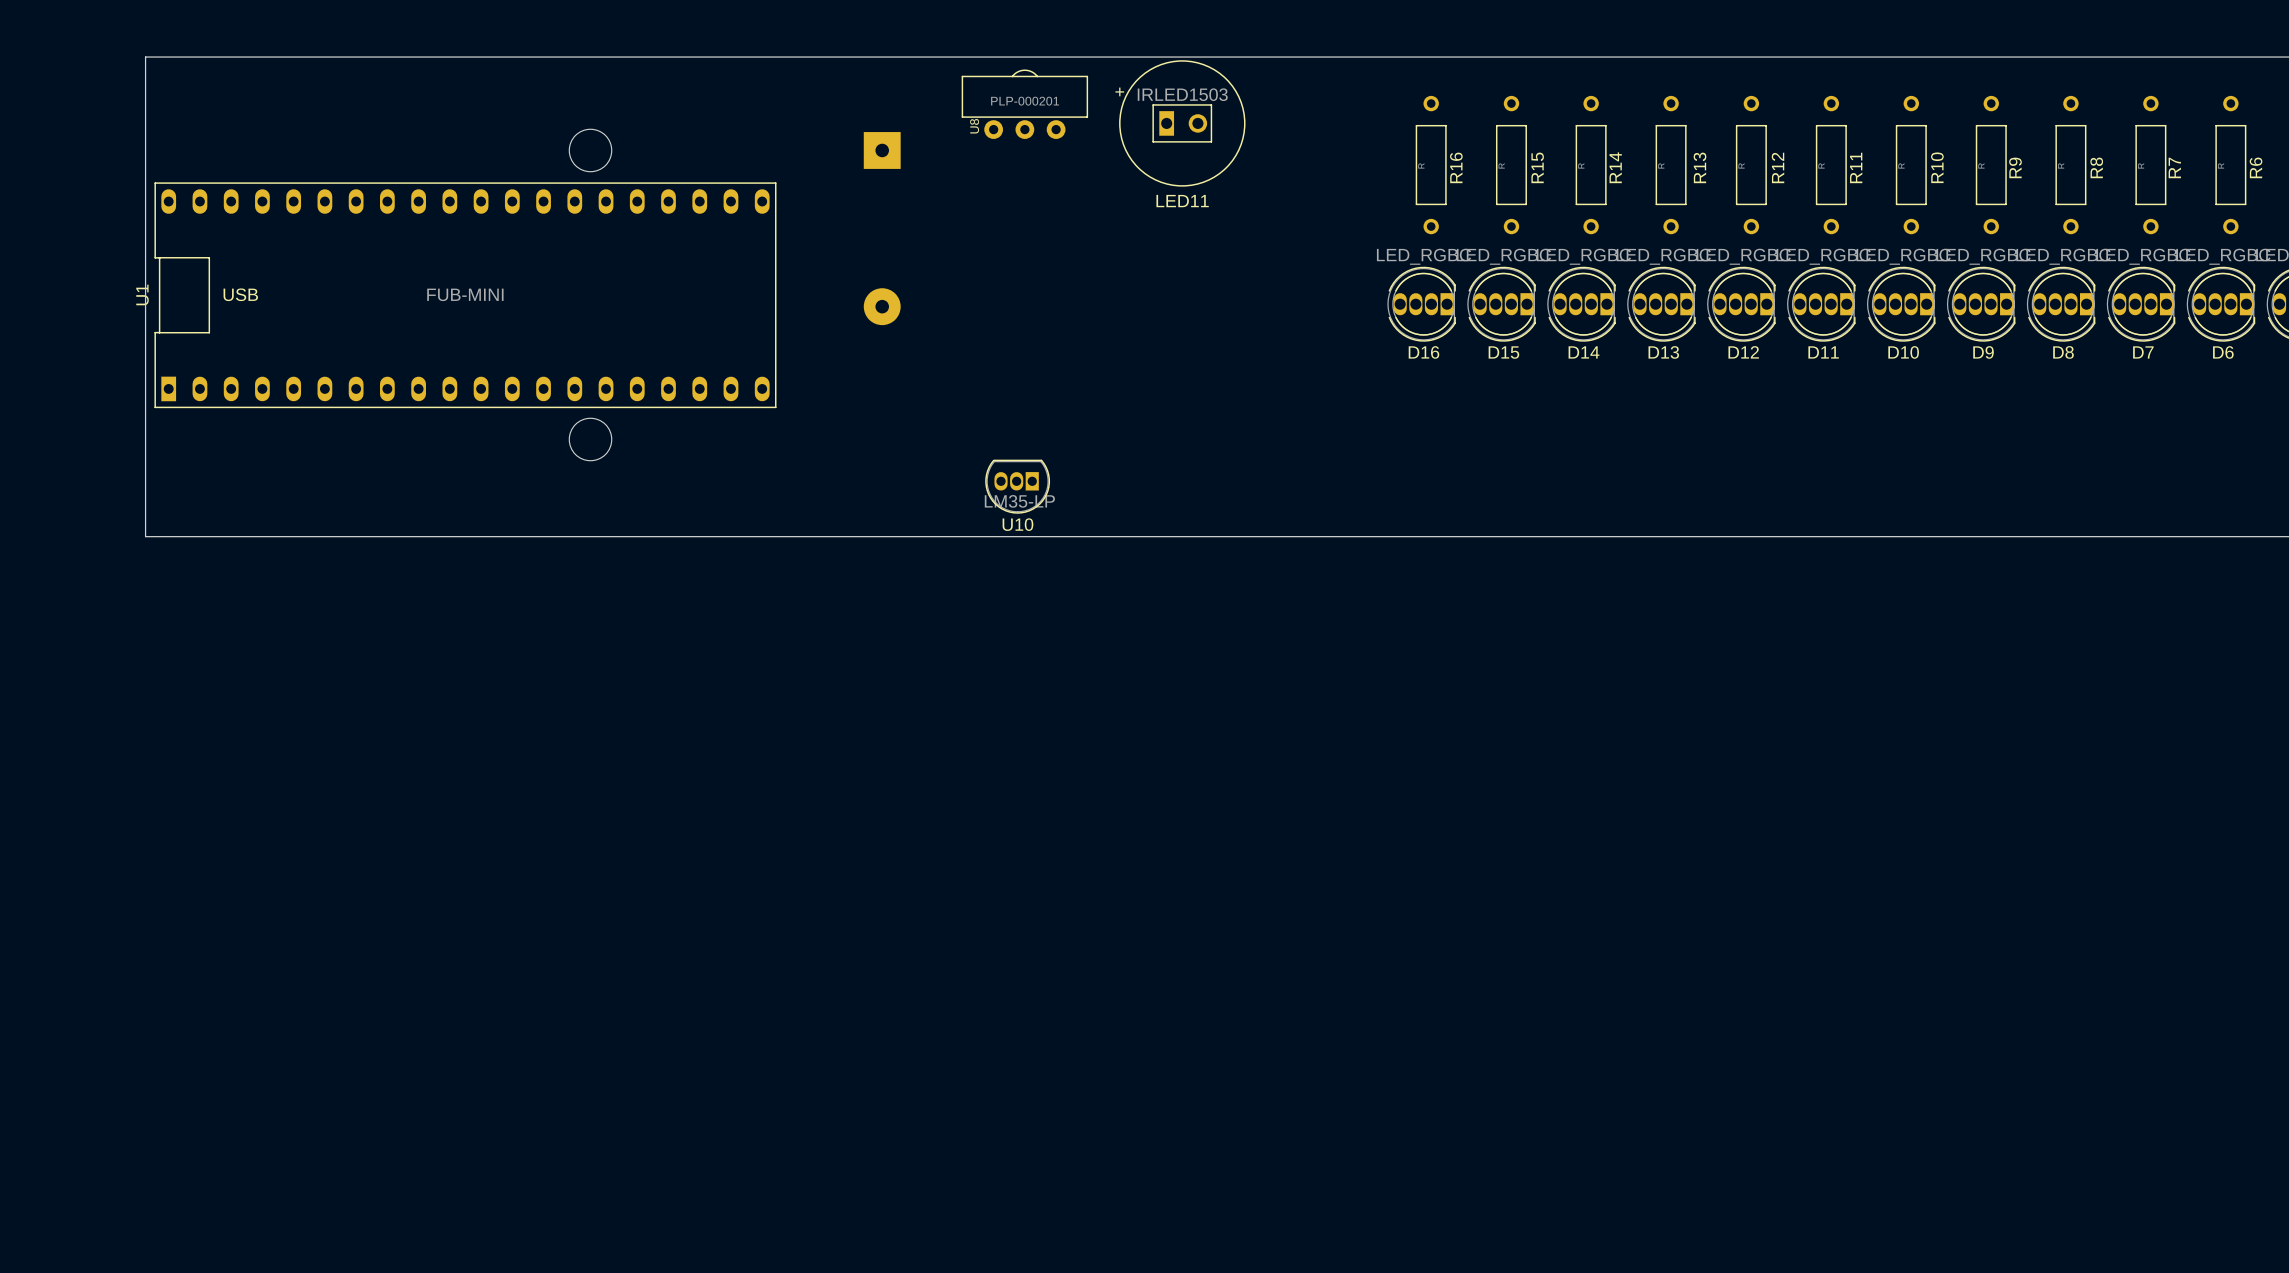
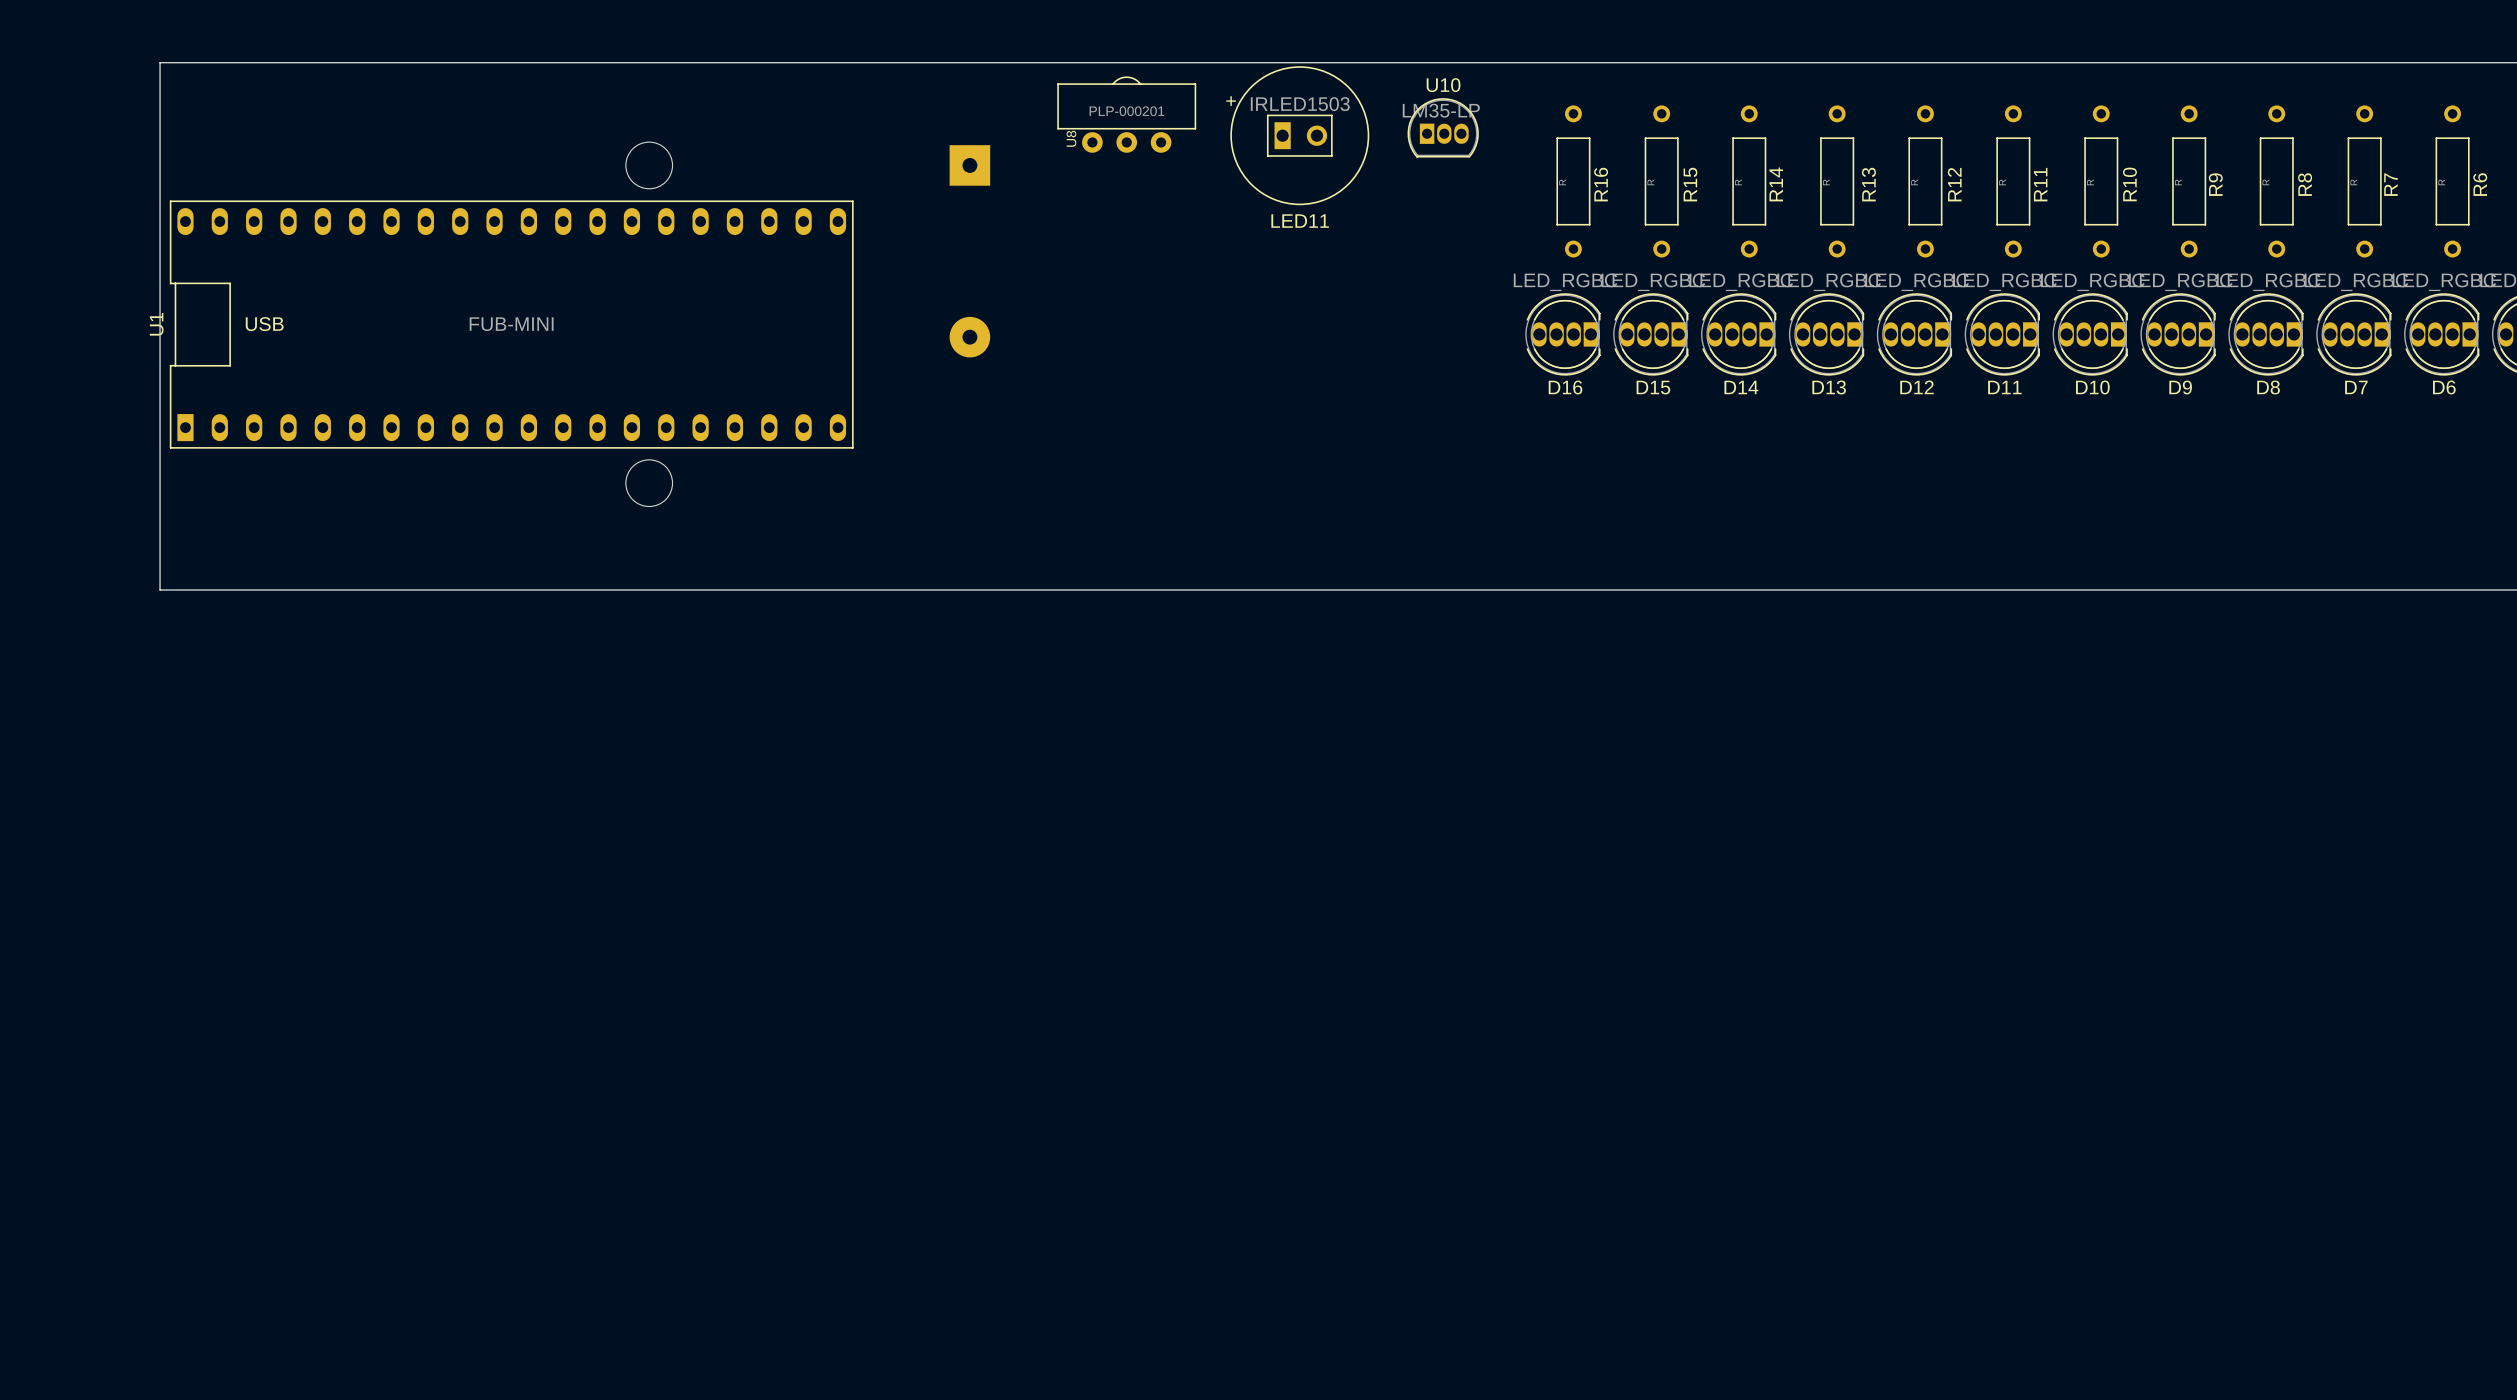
U10 rotation: 0° (1017, 486) -> 180° (1443, 127)
U10 position: (1017, 486) -> (1443, 127)

